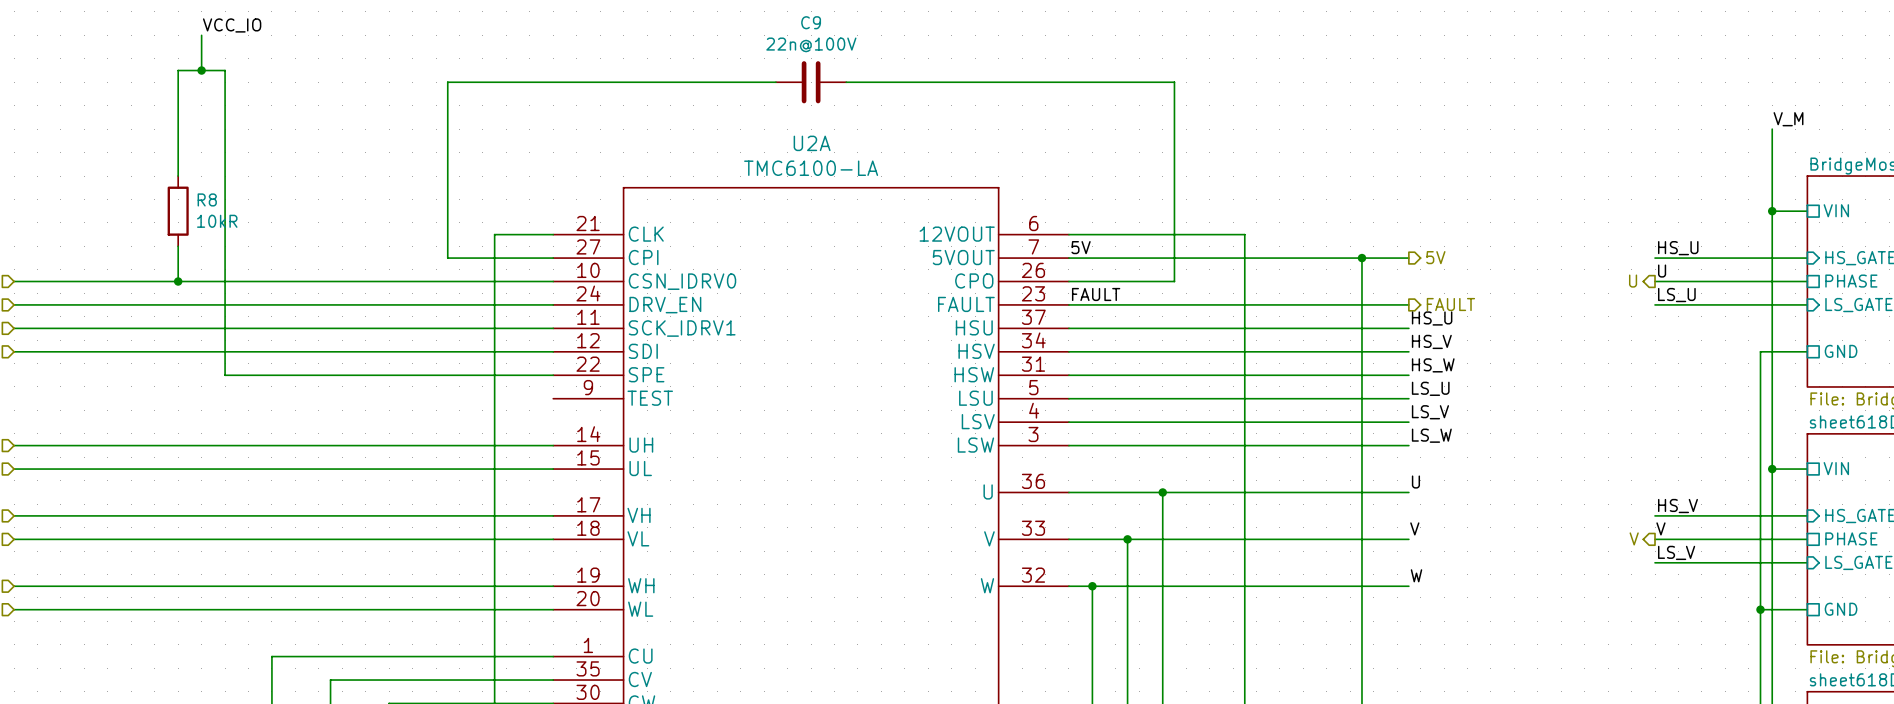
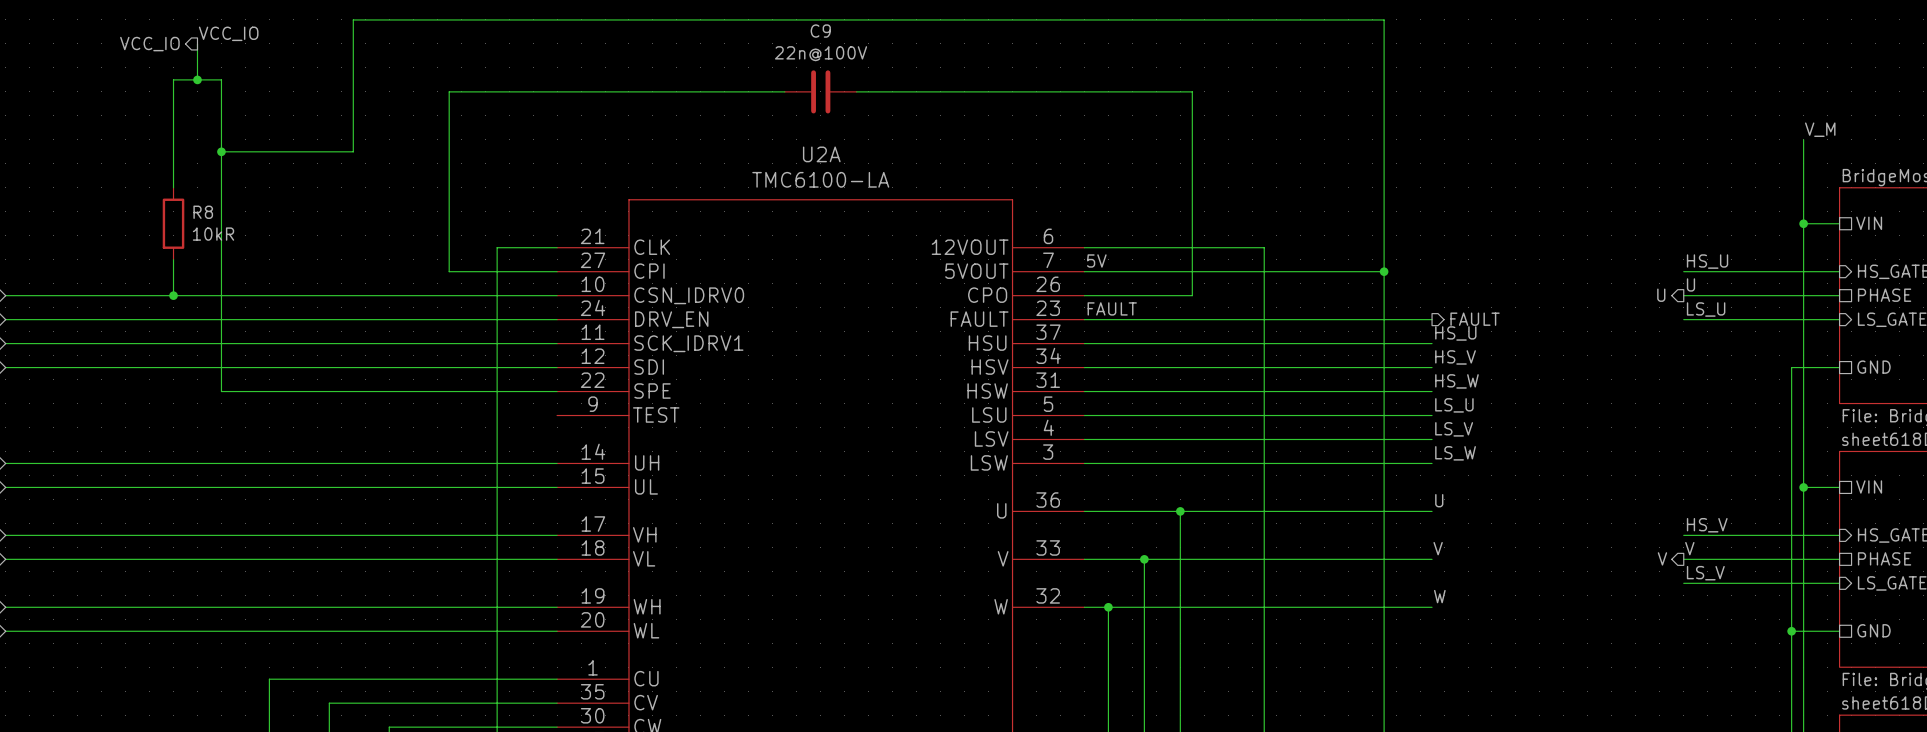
hierarchical label: none -> VCC_IO (149, 44)
junction: none -> (221, 151)
hierarchical label: 5V (1435, 257) -> none
wire: (1361, 258) (1408, 258) -> (1384, 271) (1384, 19) (353, 19) (353, 151) (221, 151)

